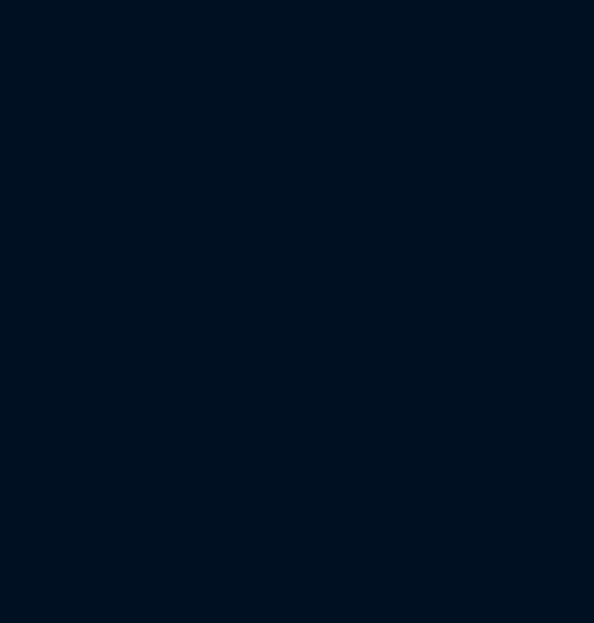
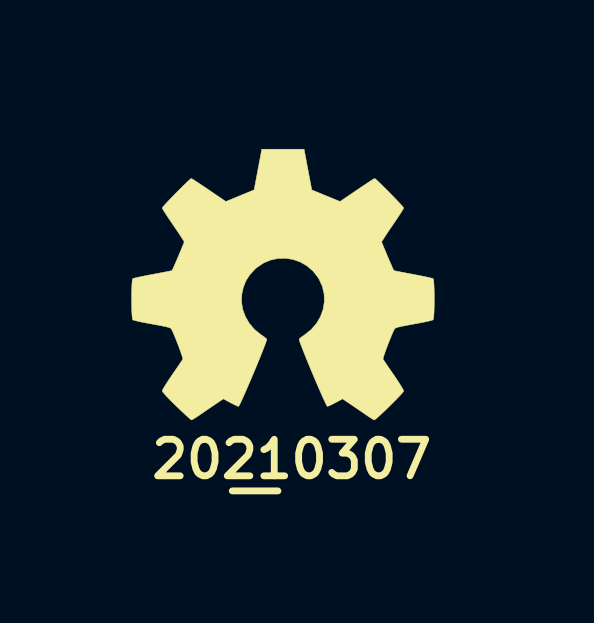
drawing: none -> [131, 148, 435, 495]

